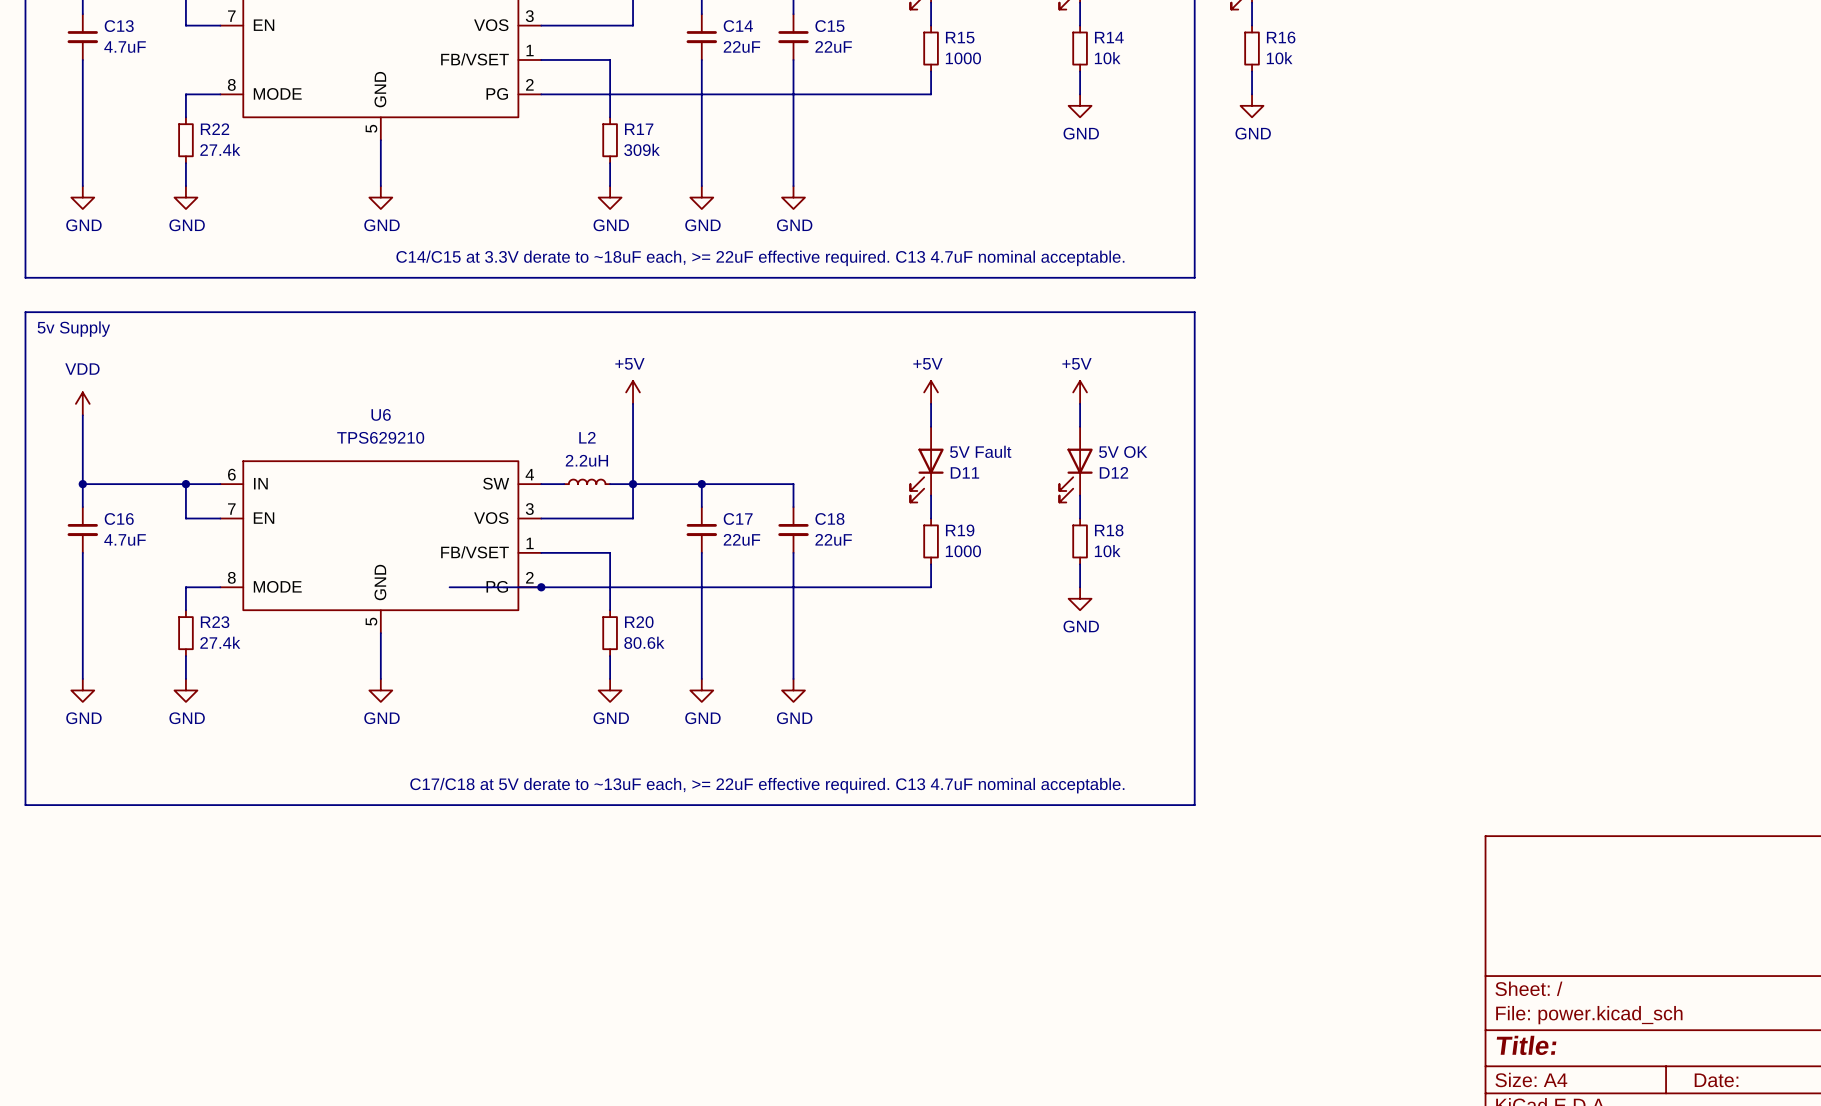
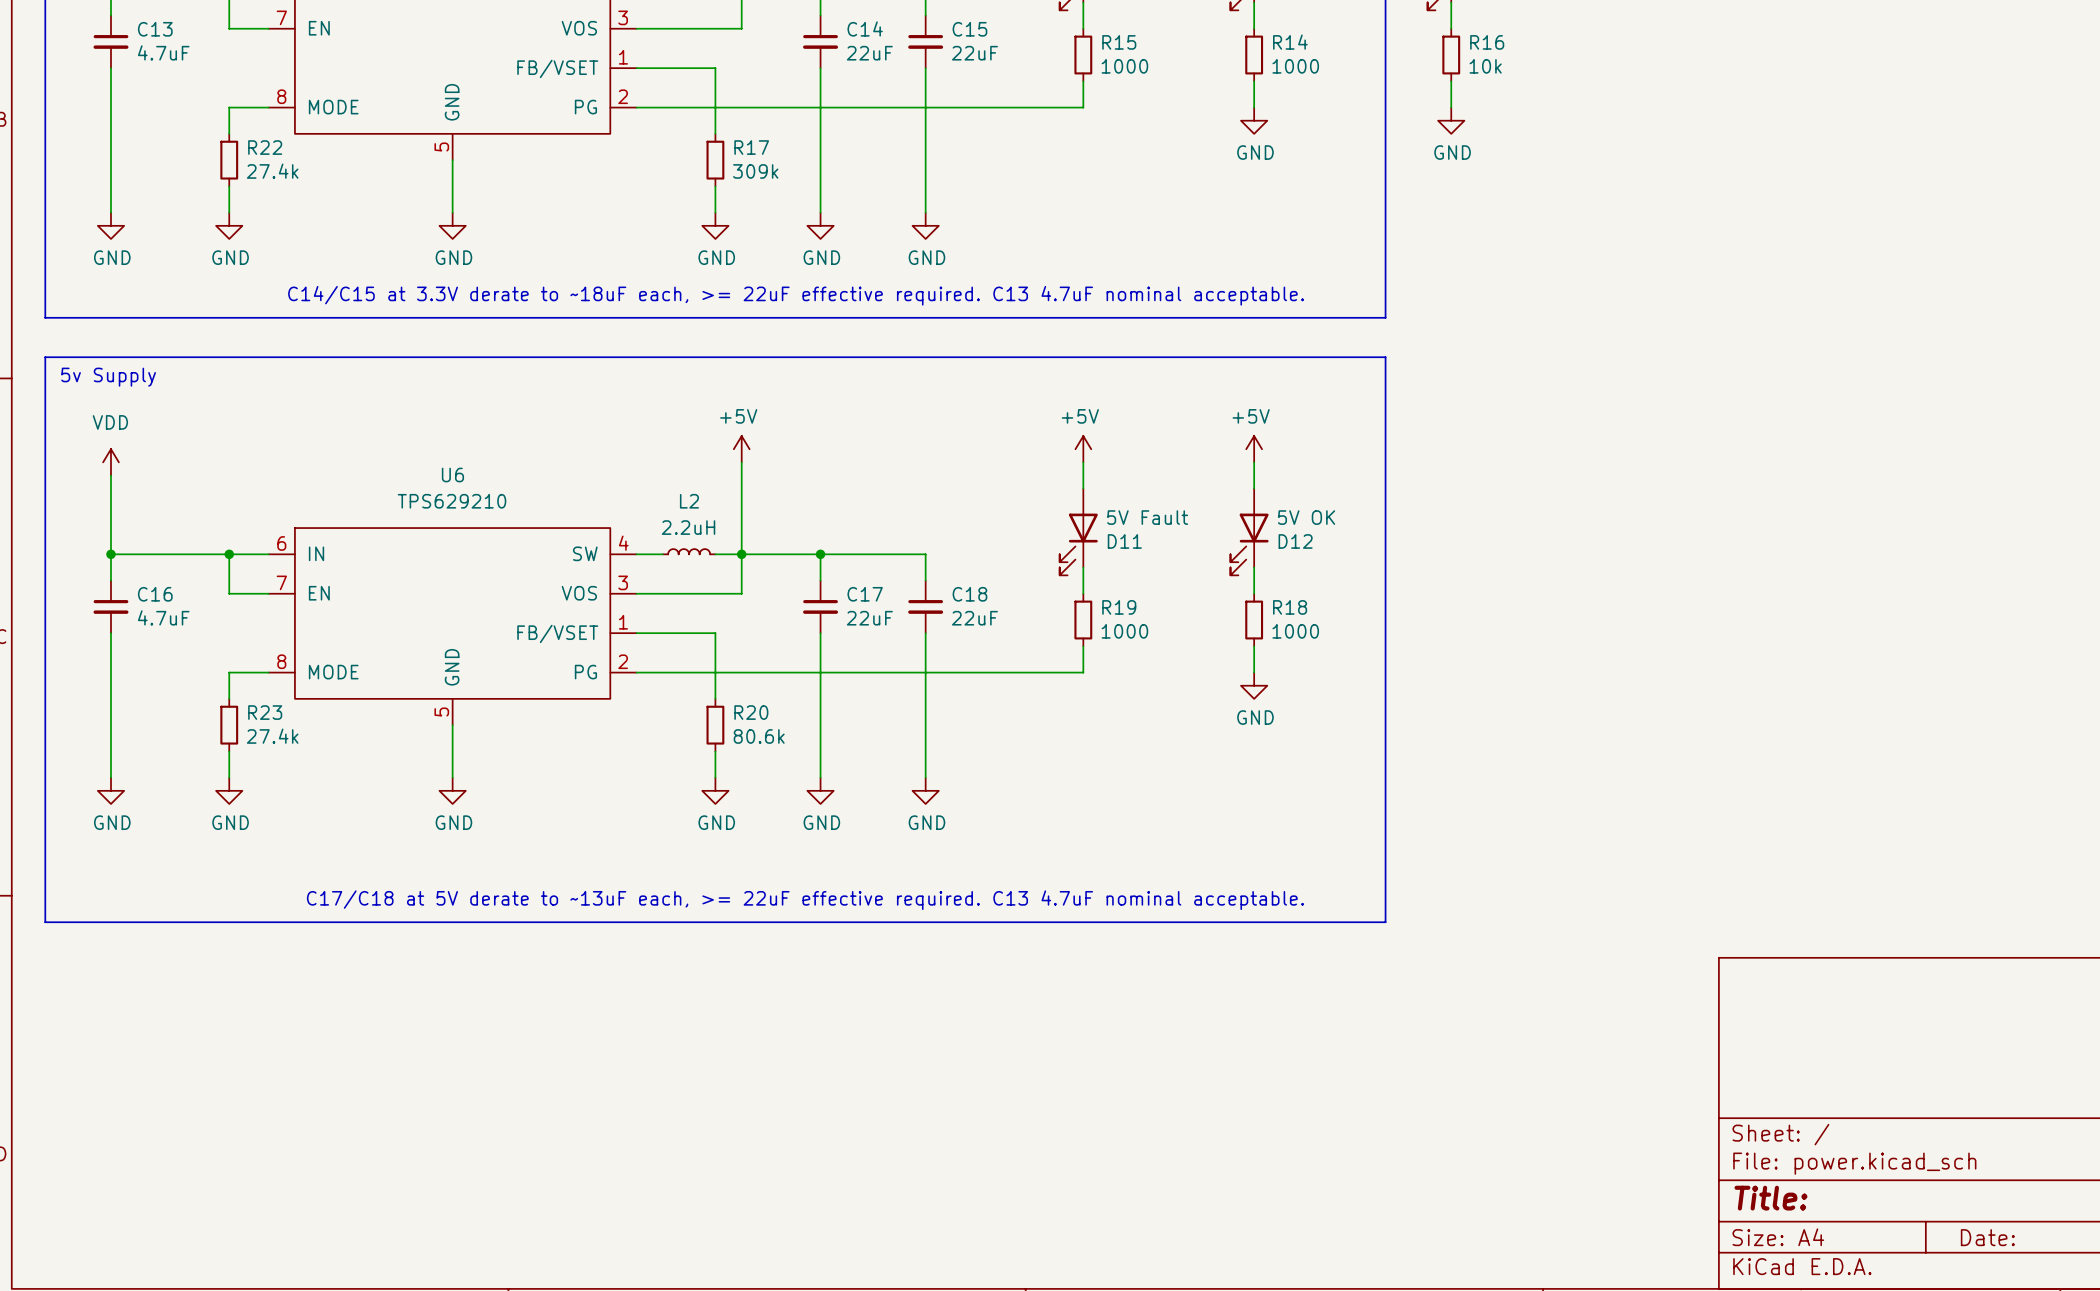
R14 value: 10k (1107, 58) -> 1000 (1295, 66)
R18 value: 10k (1107, 551) -> 1000 (1295, 631)
wire: (449, 587) (541, 587) -> none
junction: (541, 587) -> none

